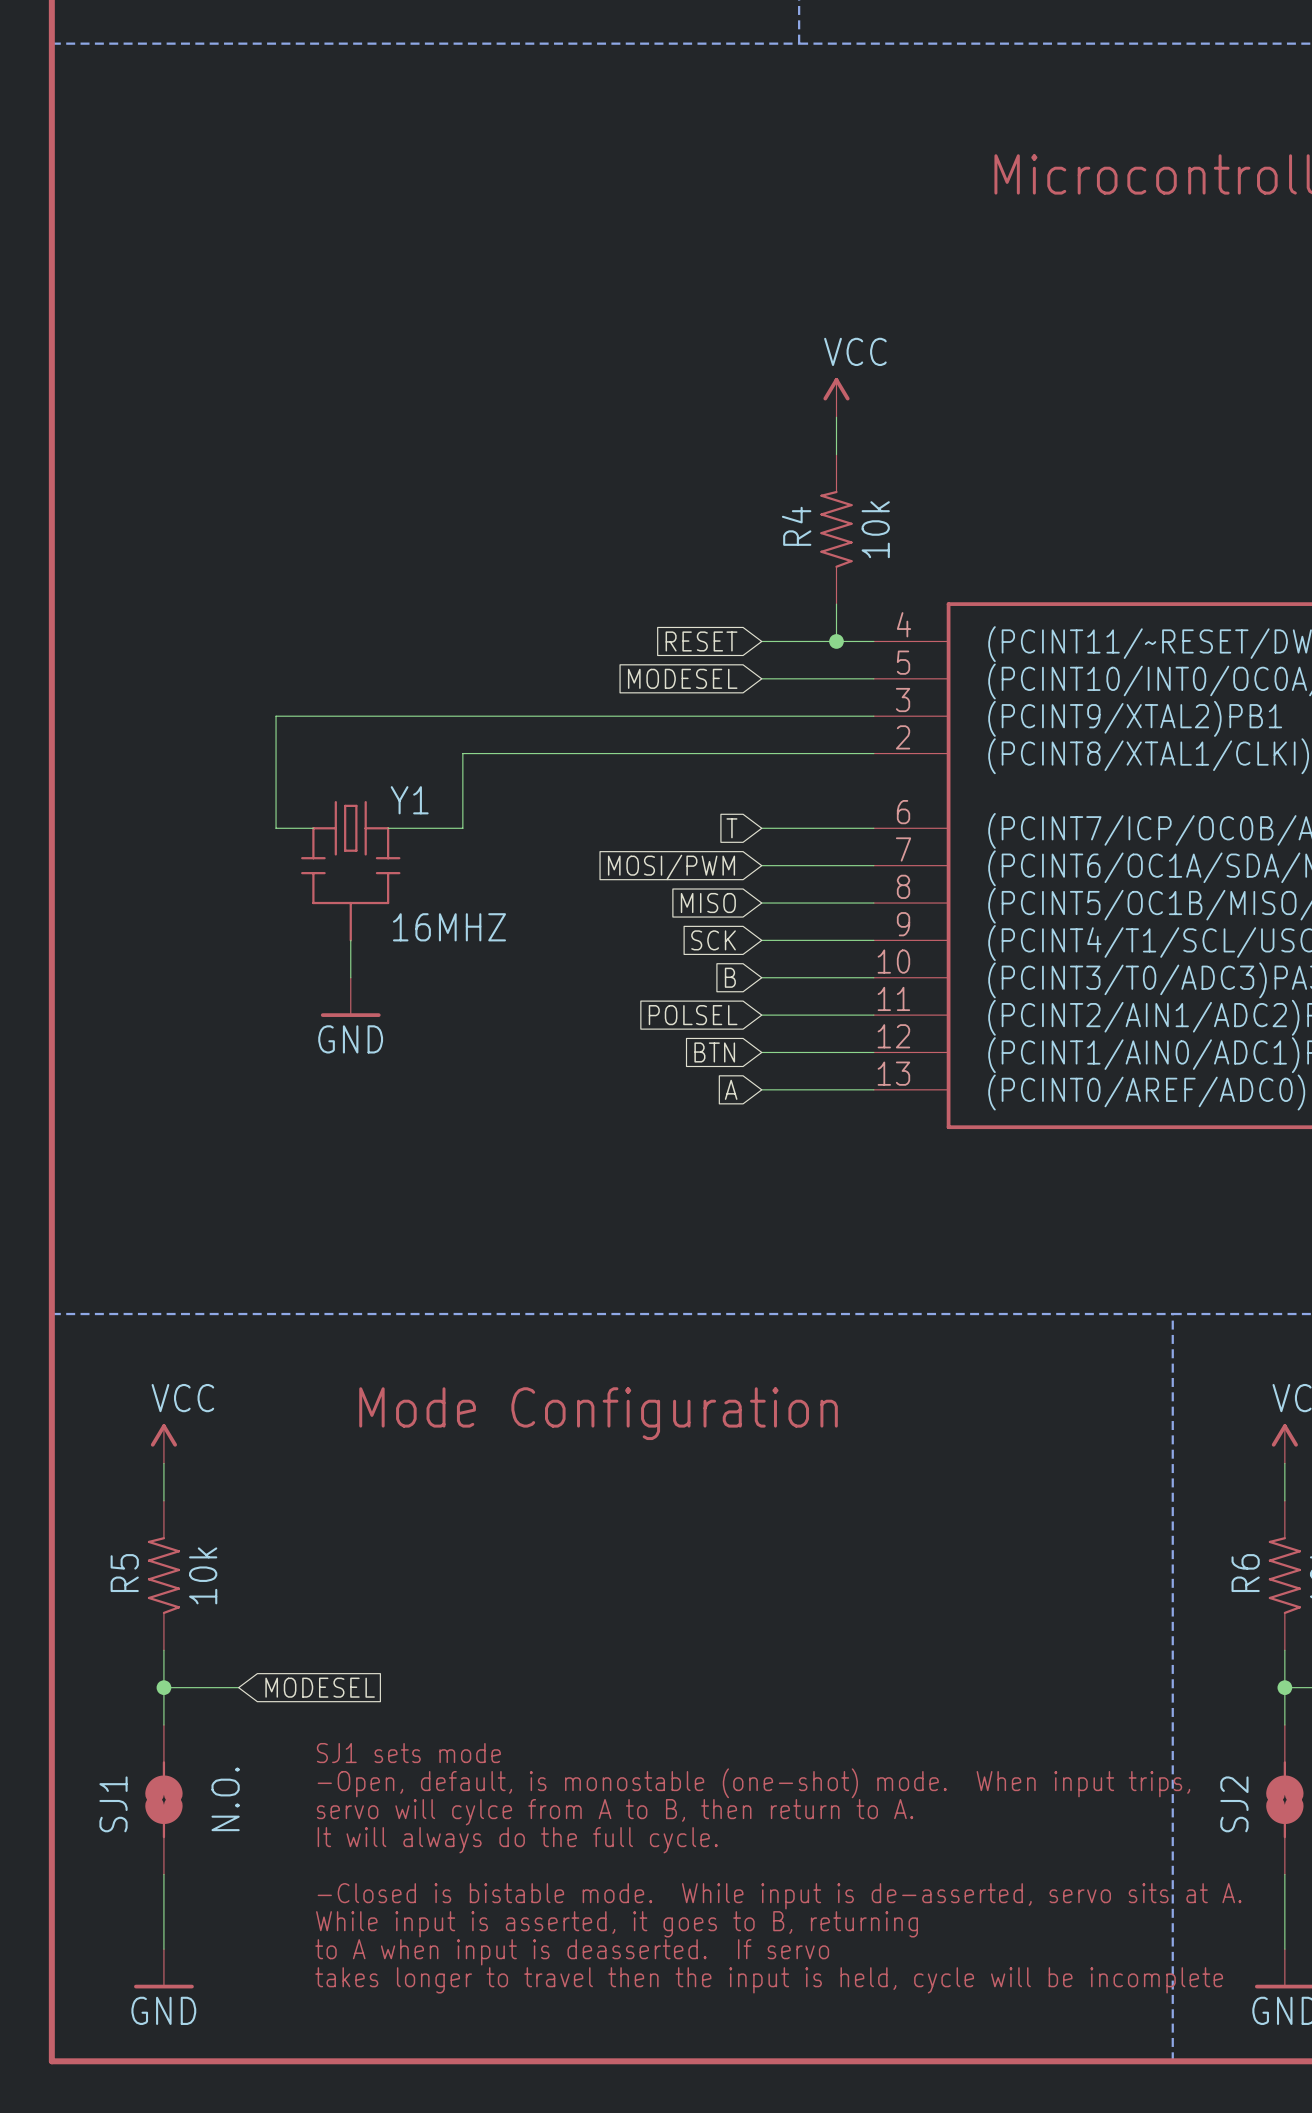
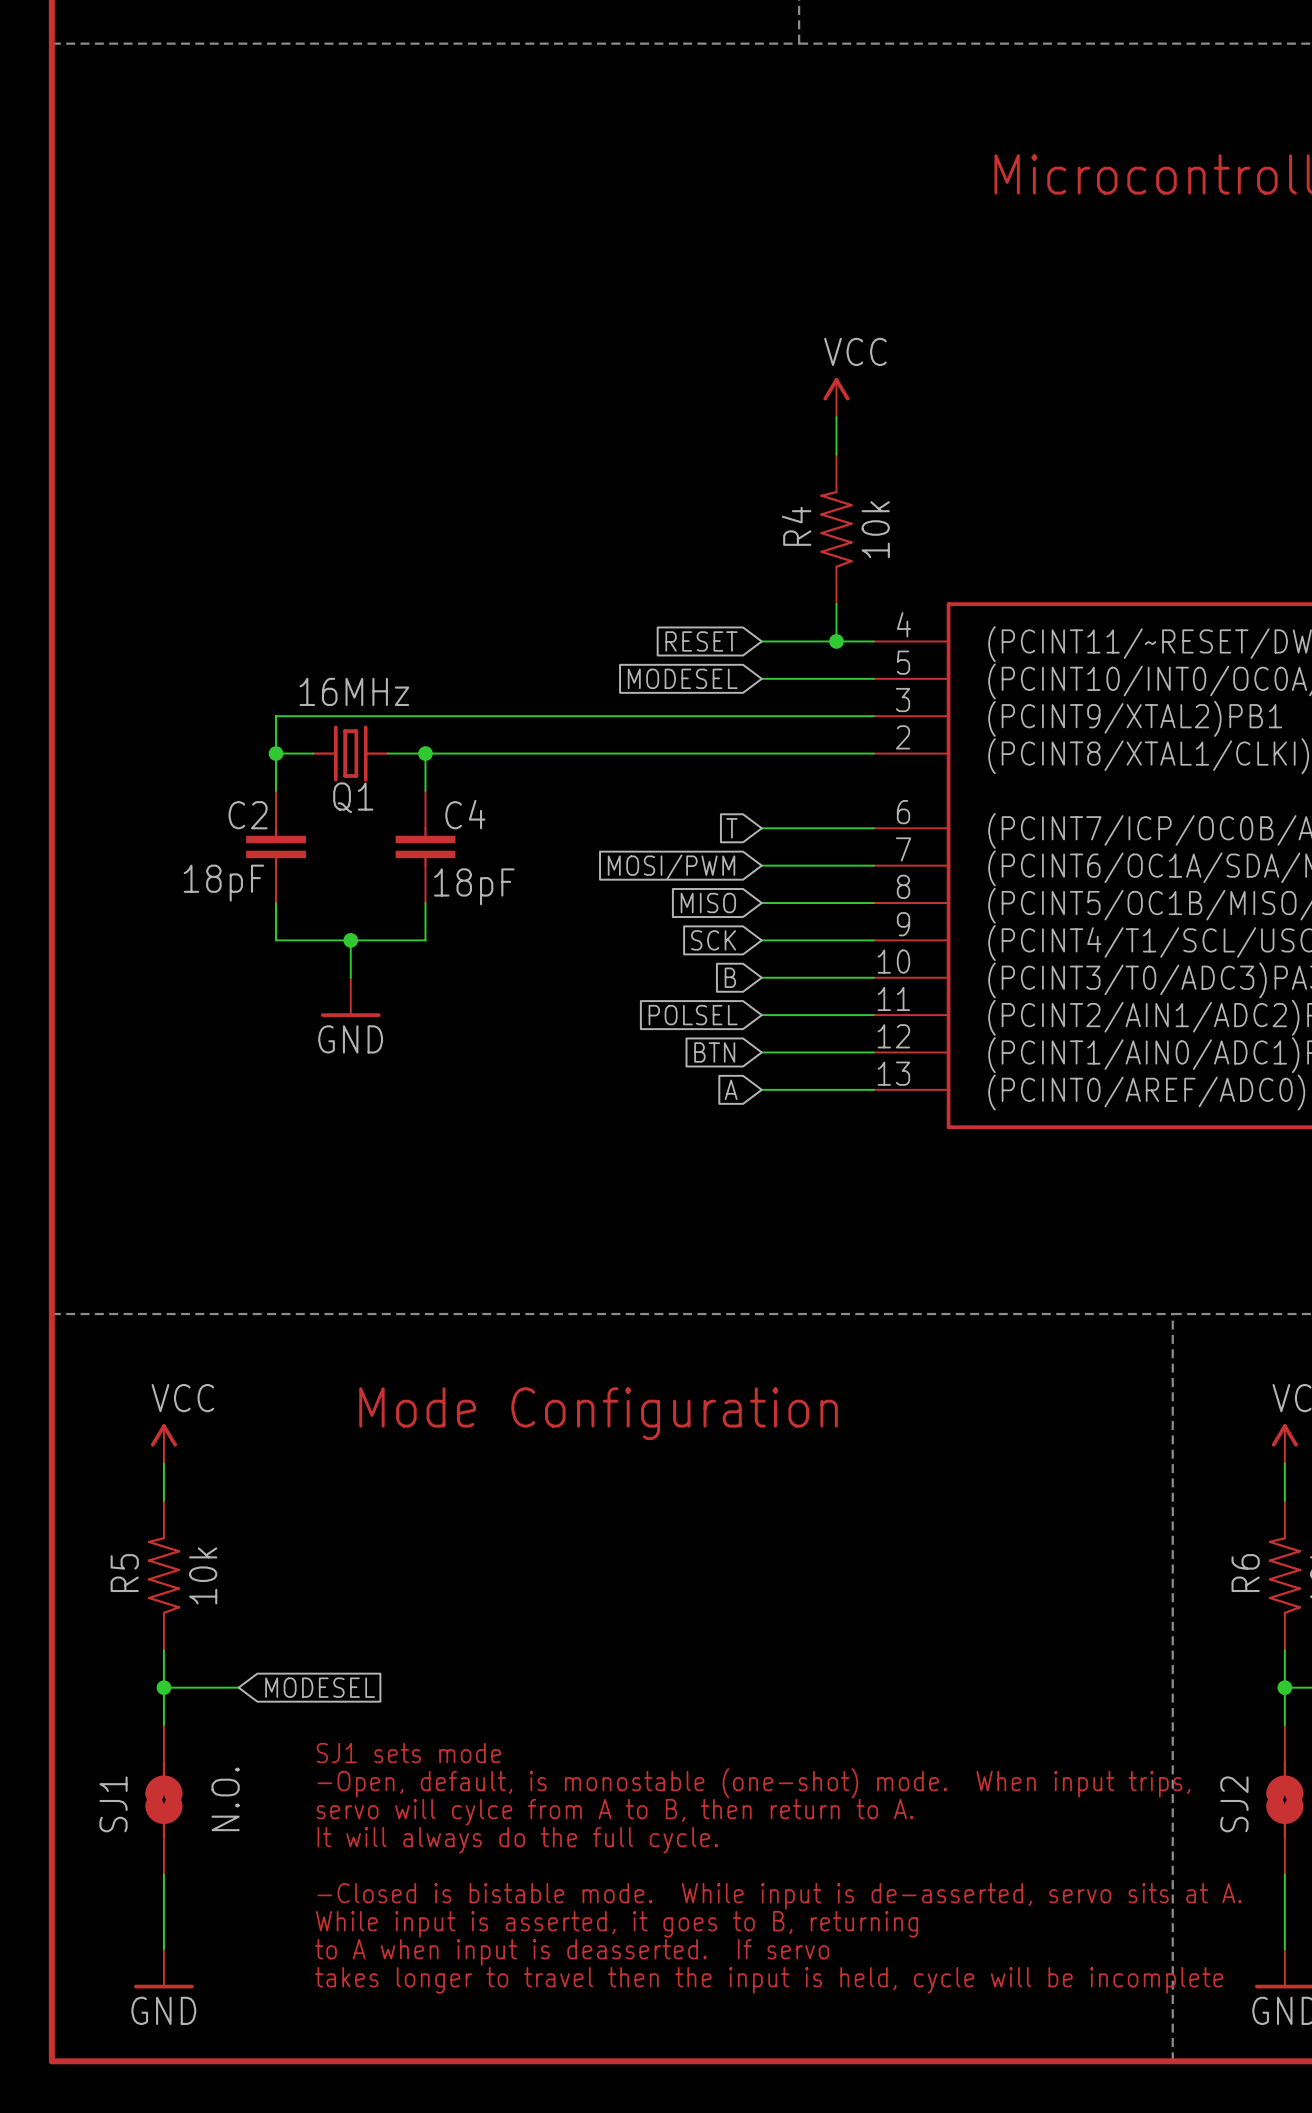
wire: none -> (276, 753) (313, 753)
junction: none -> (276, 753)
Q1: none -> 16MHz (350, 753)
wire: none -> (425, 753) (425, 790)
junction: none -> (425, 753)
wire: (462, 753) (462, 828) (388, 828) -> (462, 753) (388, 753)
wire: (276, 790) (276, 828) (313, 828) -> none
C2: none -> 18pF (276, 846)
C4: none -> 18pF (425, 846)
Y1: 16MHZ (350, 871) -> none
wire: none -> (276, 903) (276, 940) (425, 940) (425, 903)
junction: none -> (350, 940)

